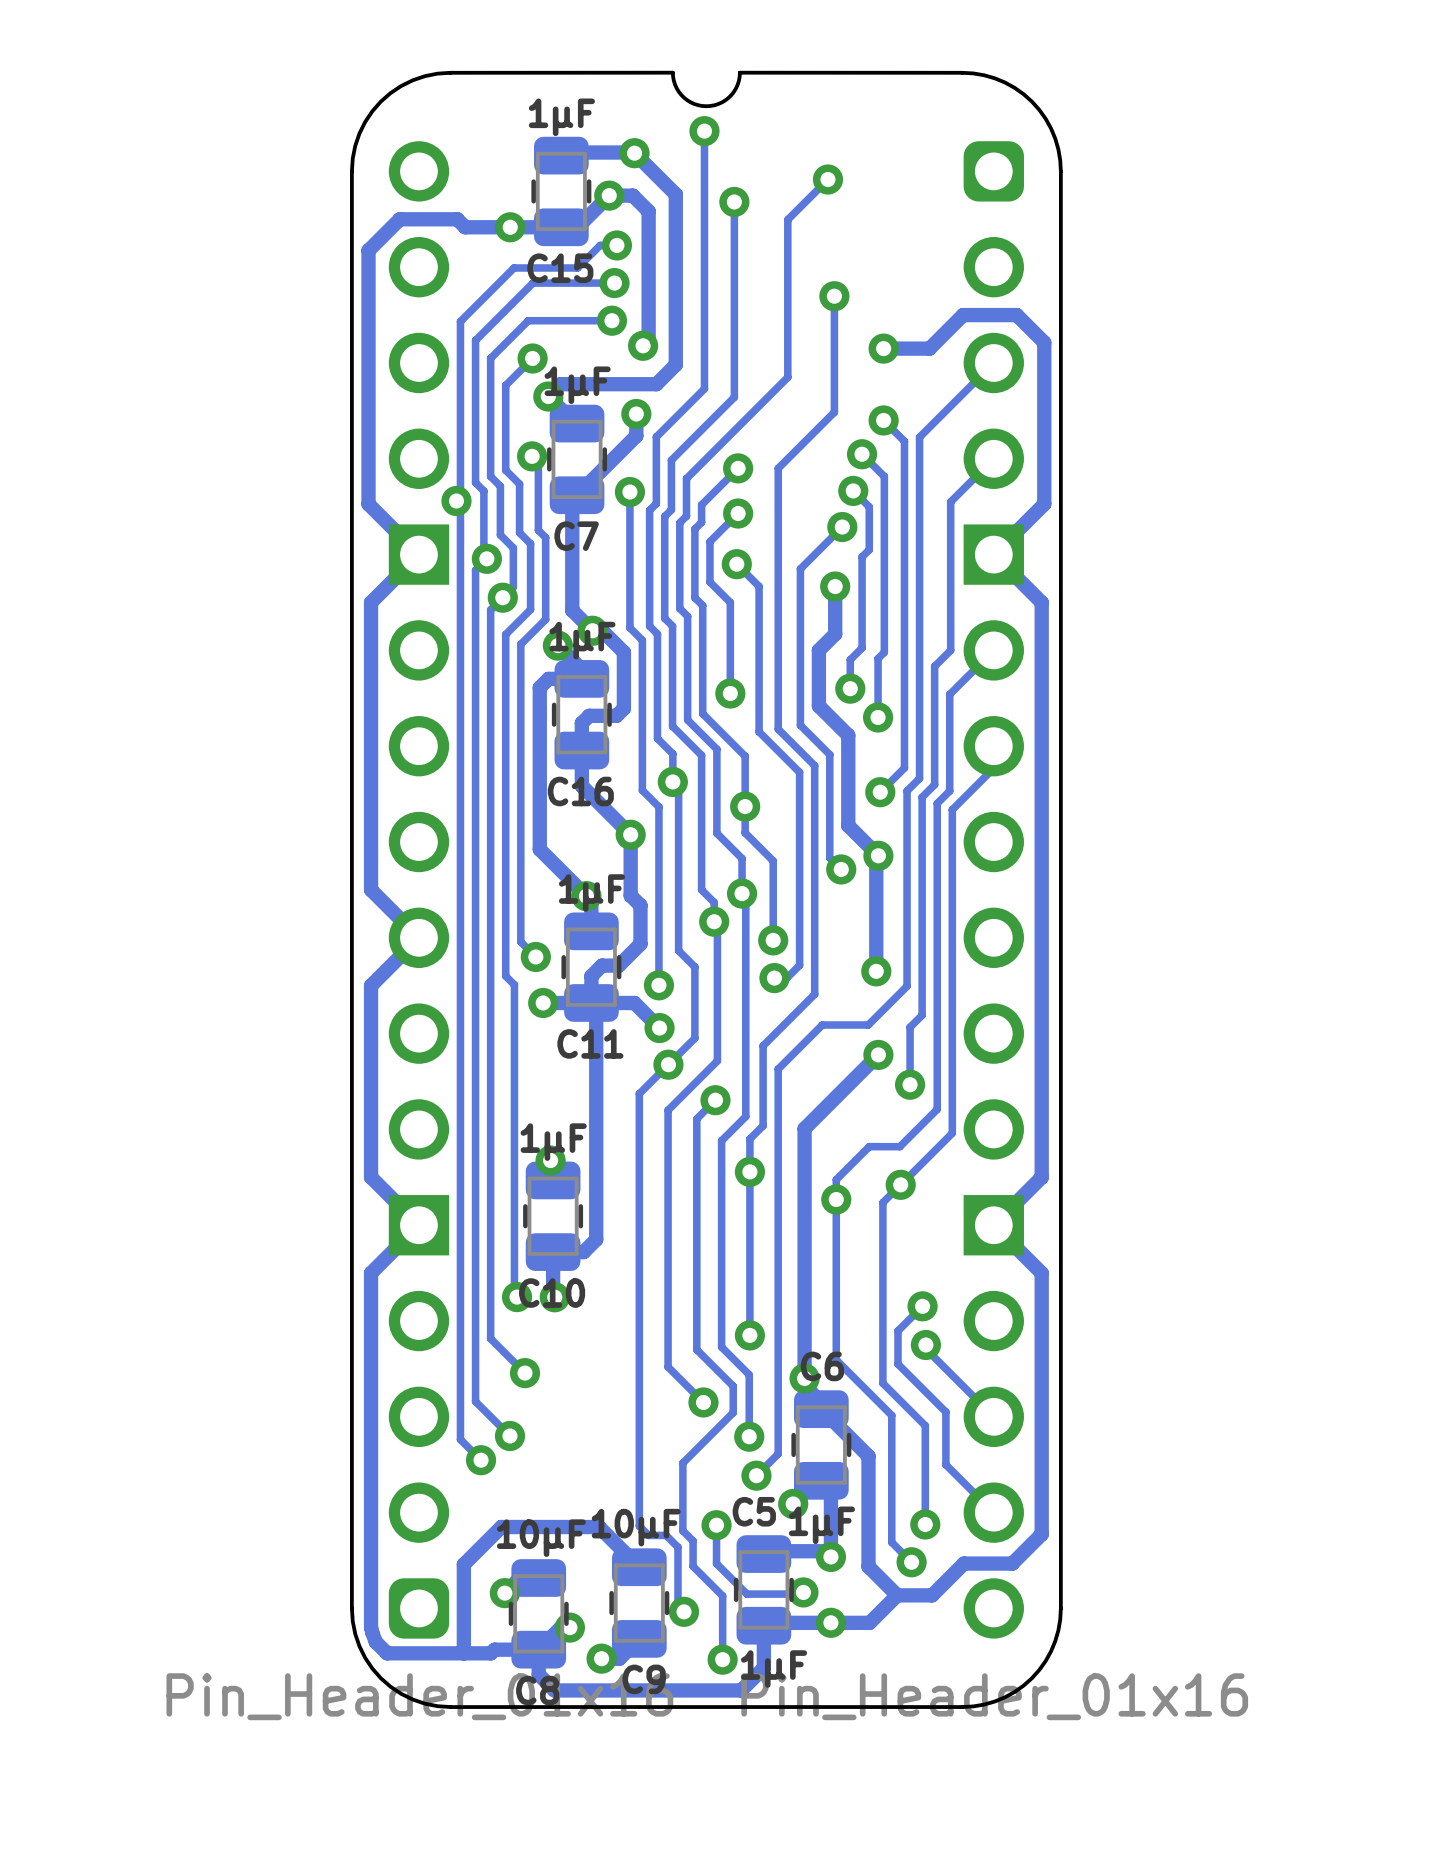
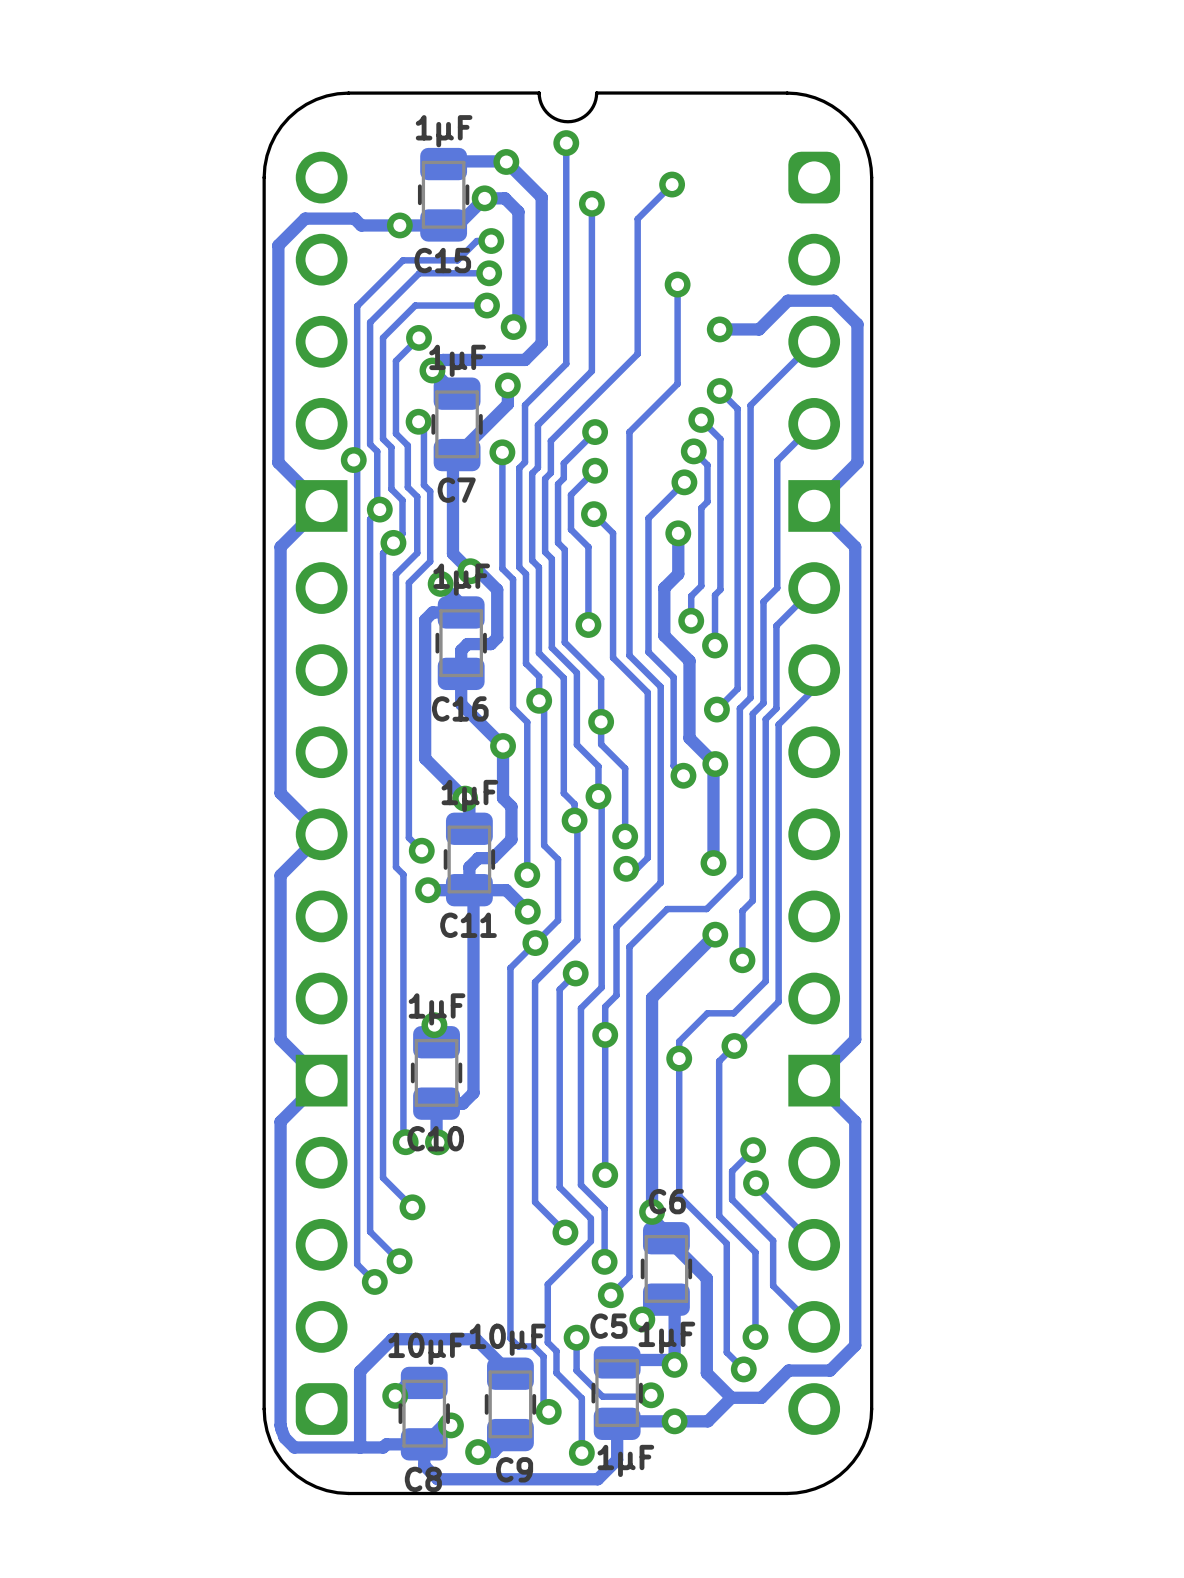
drawing: [166, 1673, 1249, 1721] -> none

